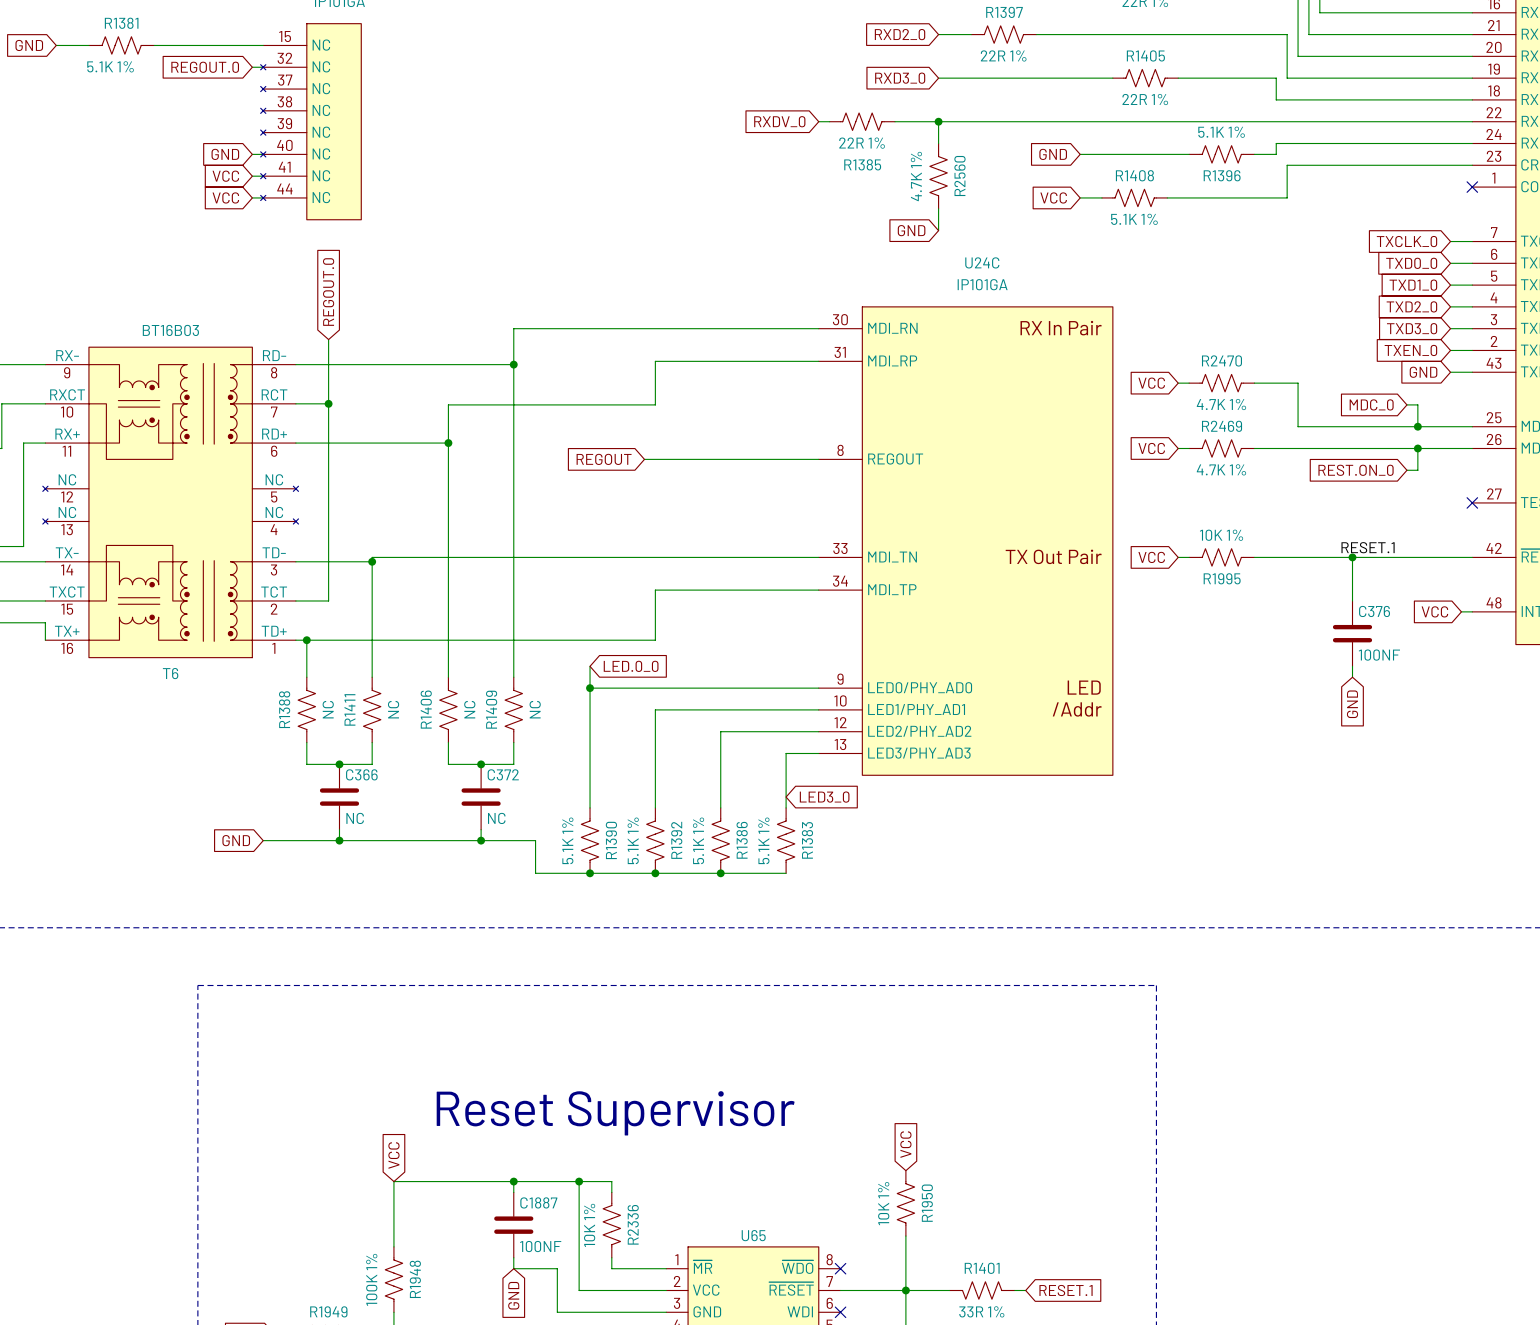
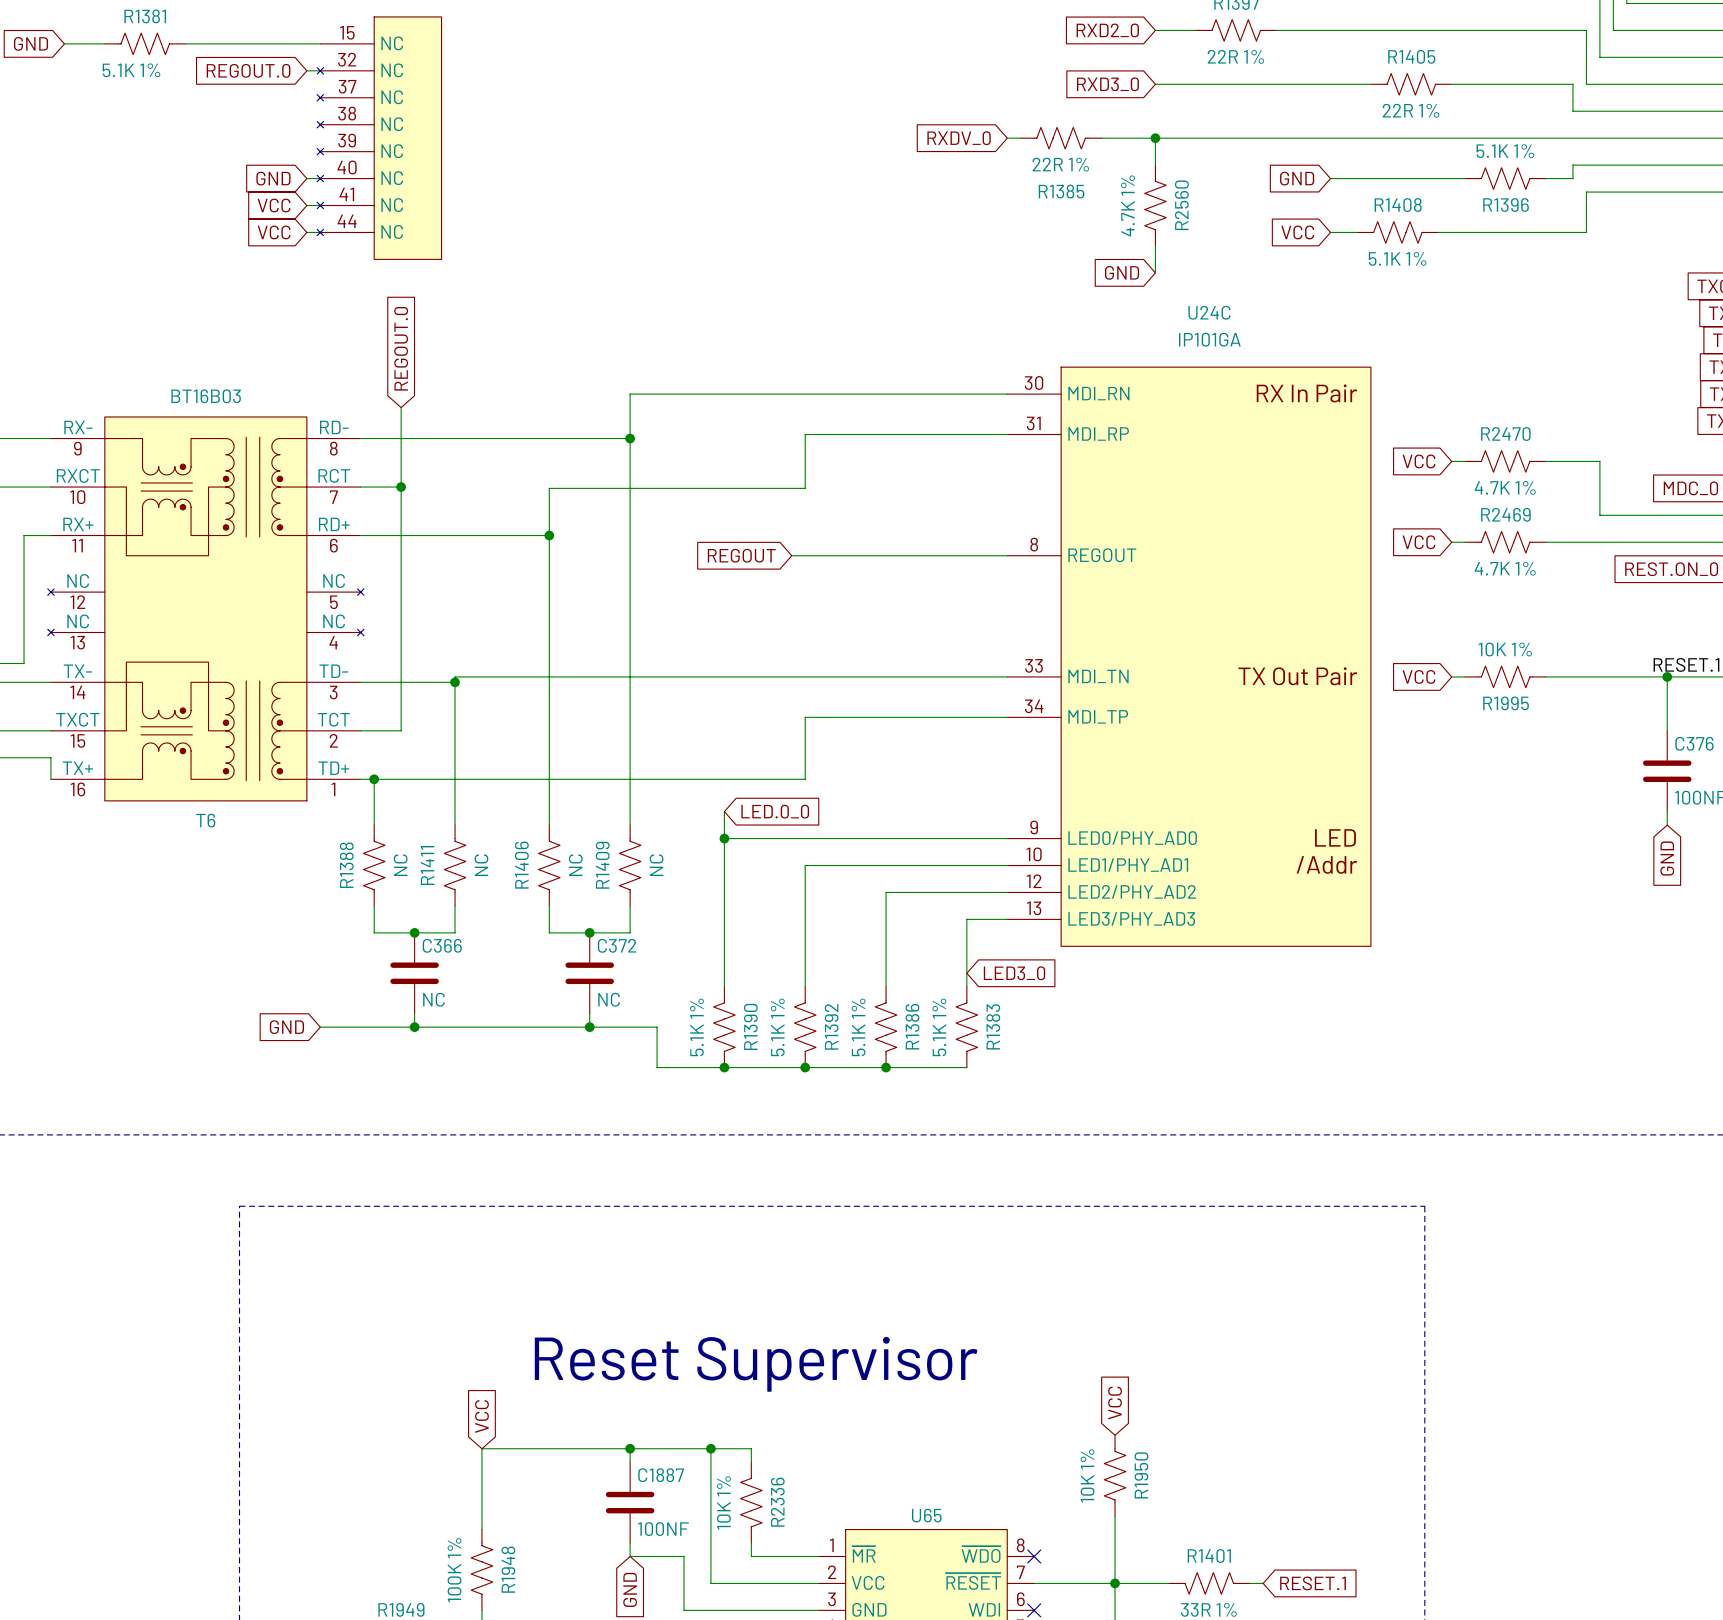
T6 symbol: [42, 347, 299, 658] -> [47, 416, 364, 801]

